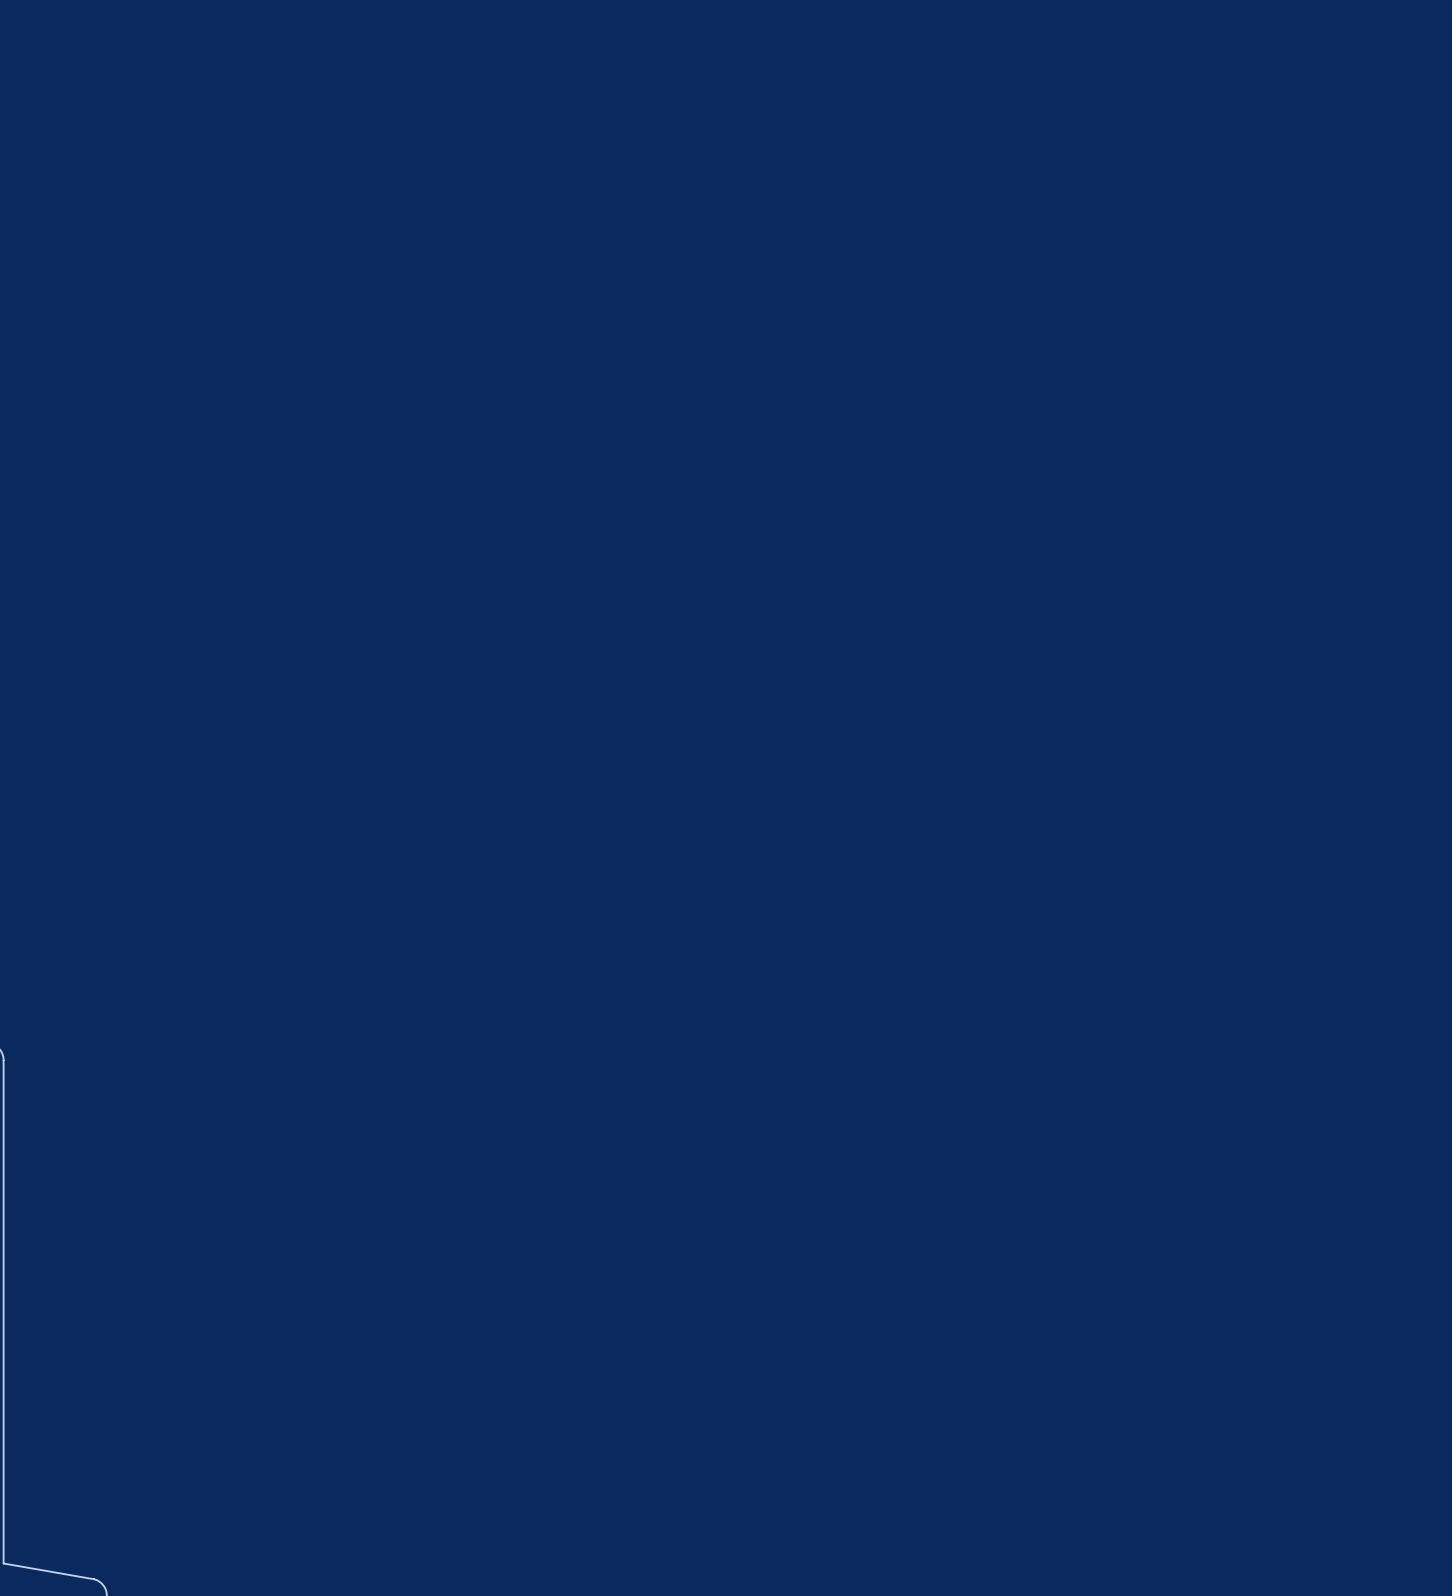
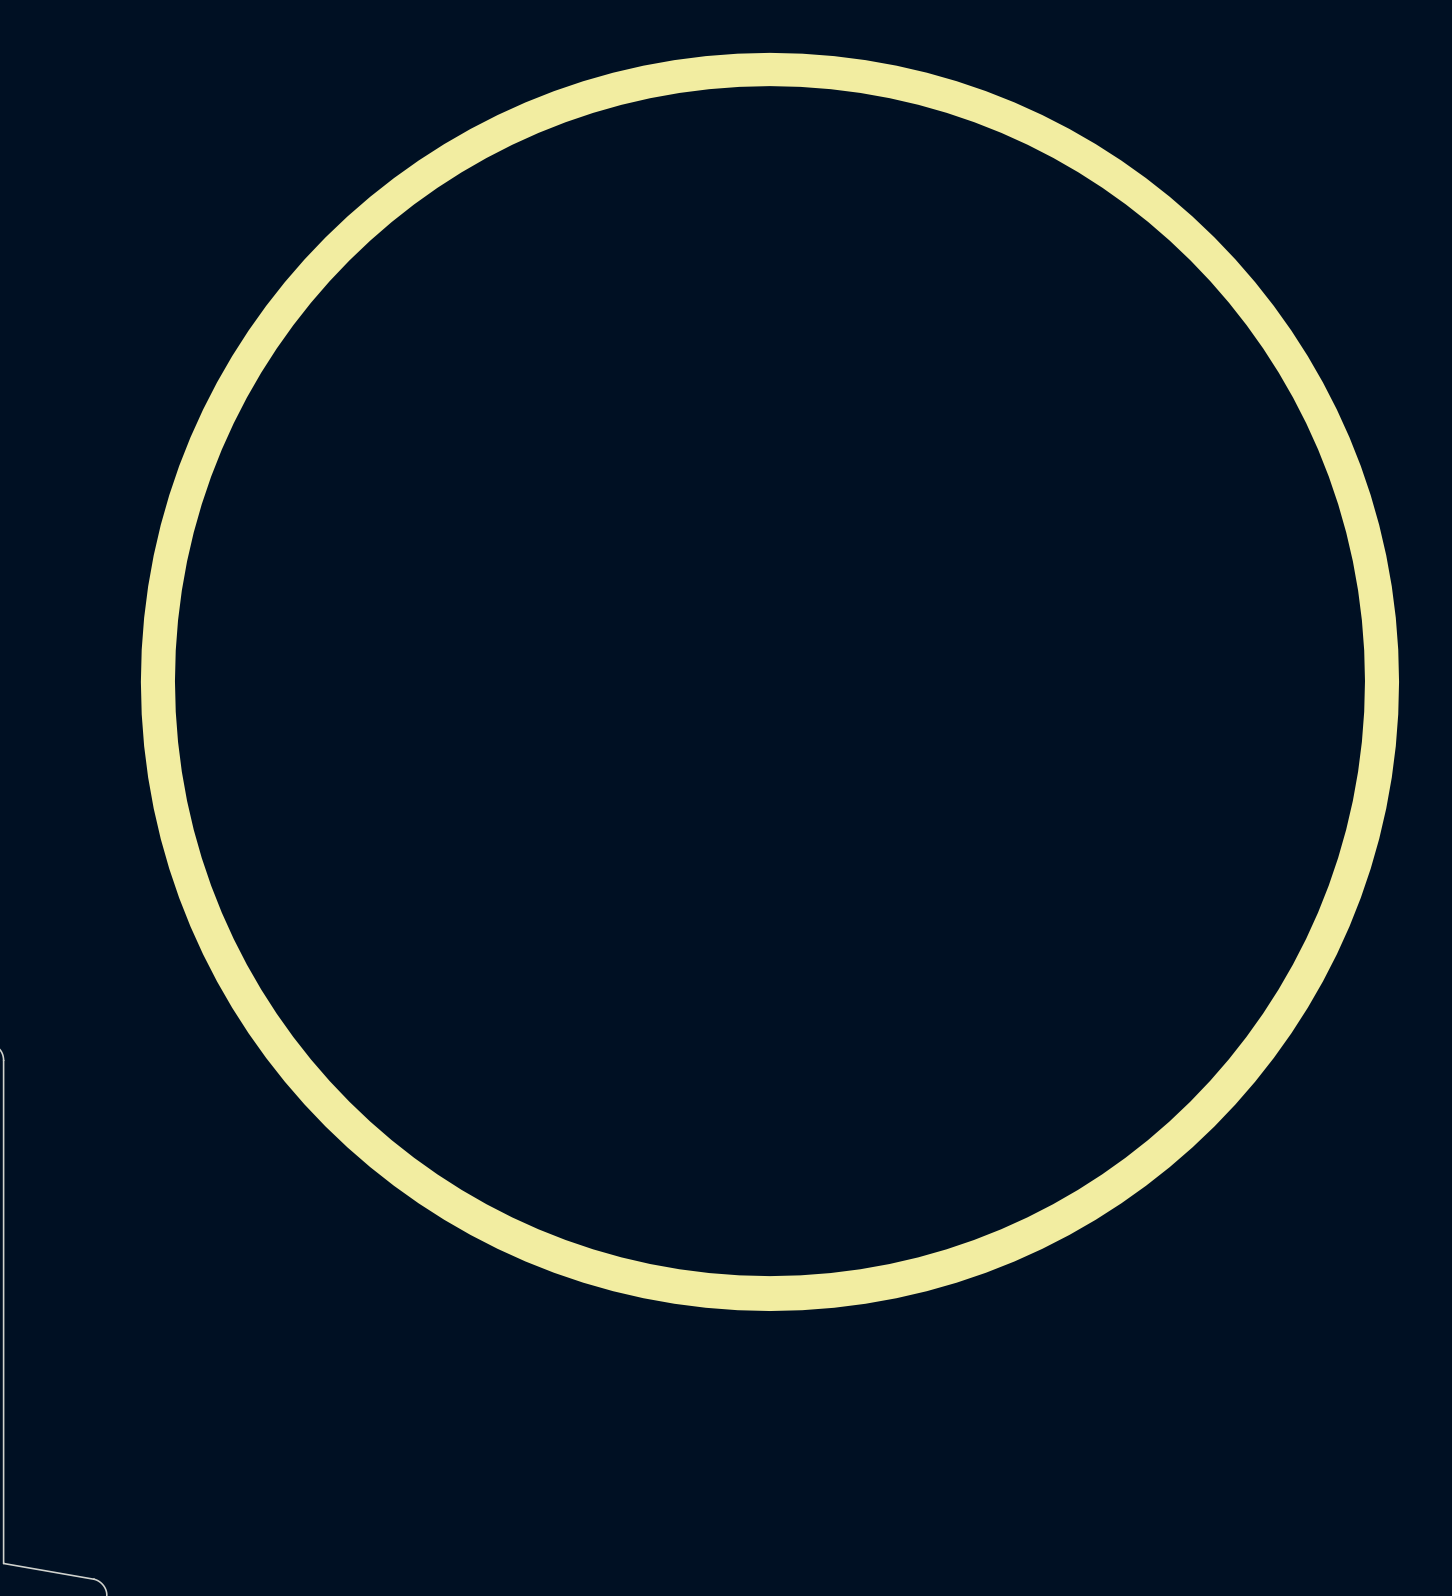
drawing: none -> [140, 52, 1400, 1312]

